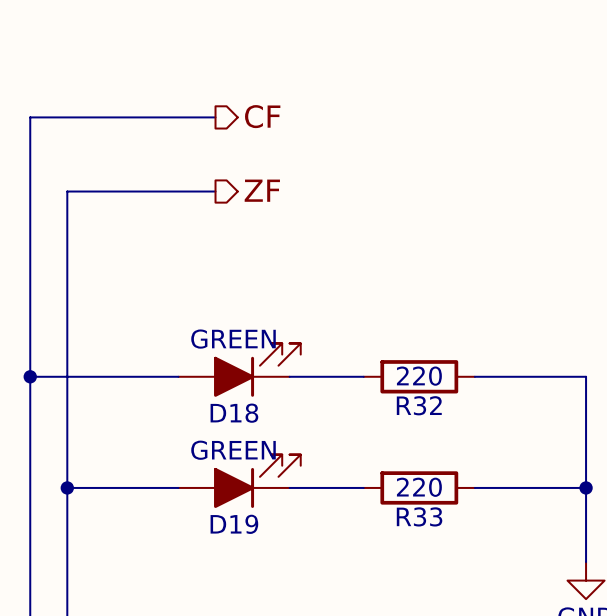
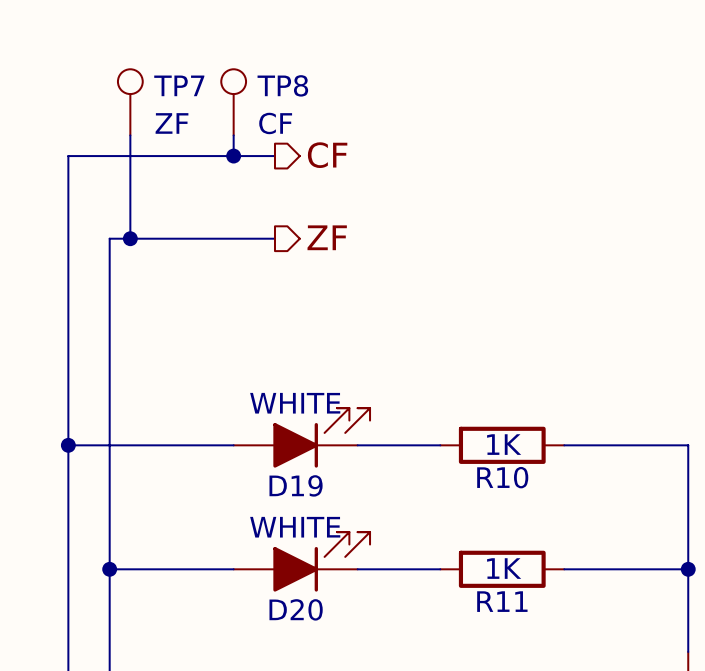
TP7: none -> ZF (130, 102)
TP8: none -> CF (233, 102)
wire: none -> (130, 135) (130, 238)
wire: none -> (233, 135) (233, 156)
junction: none -> (233, 156)
junction: none -> (130, 238)
D18 value: GREEN (233, 339) -> WHITE (295, 403)
R32 value: 220 (419, 376) -> 1K (504, 444)
R32 name: R32 (419, 405) -> R10 (502, 477)
D18 name: D18 (234, 413) -> D19 (296, 485)
D19 value: GREEN (233, 450) -> WHITE (295, 527)
R33 value: 220 (419, 487) -> 1K (504, 568)
R33 name: R33 (419, 516) -> R11 (502, 601)
D19 name: D19 (234, 524) -> D20 (296, 609)

